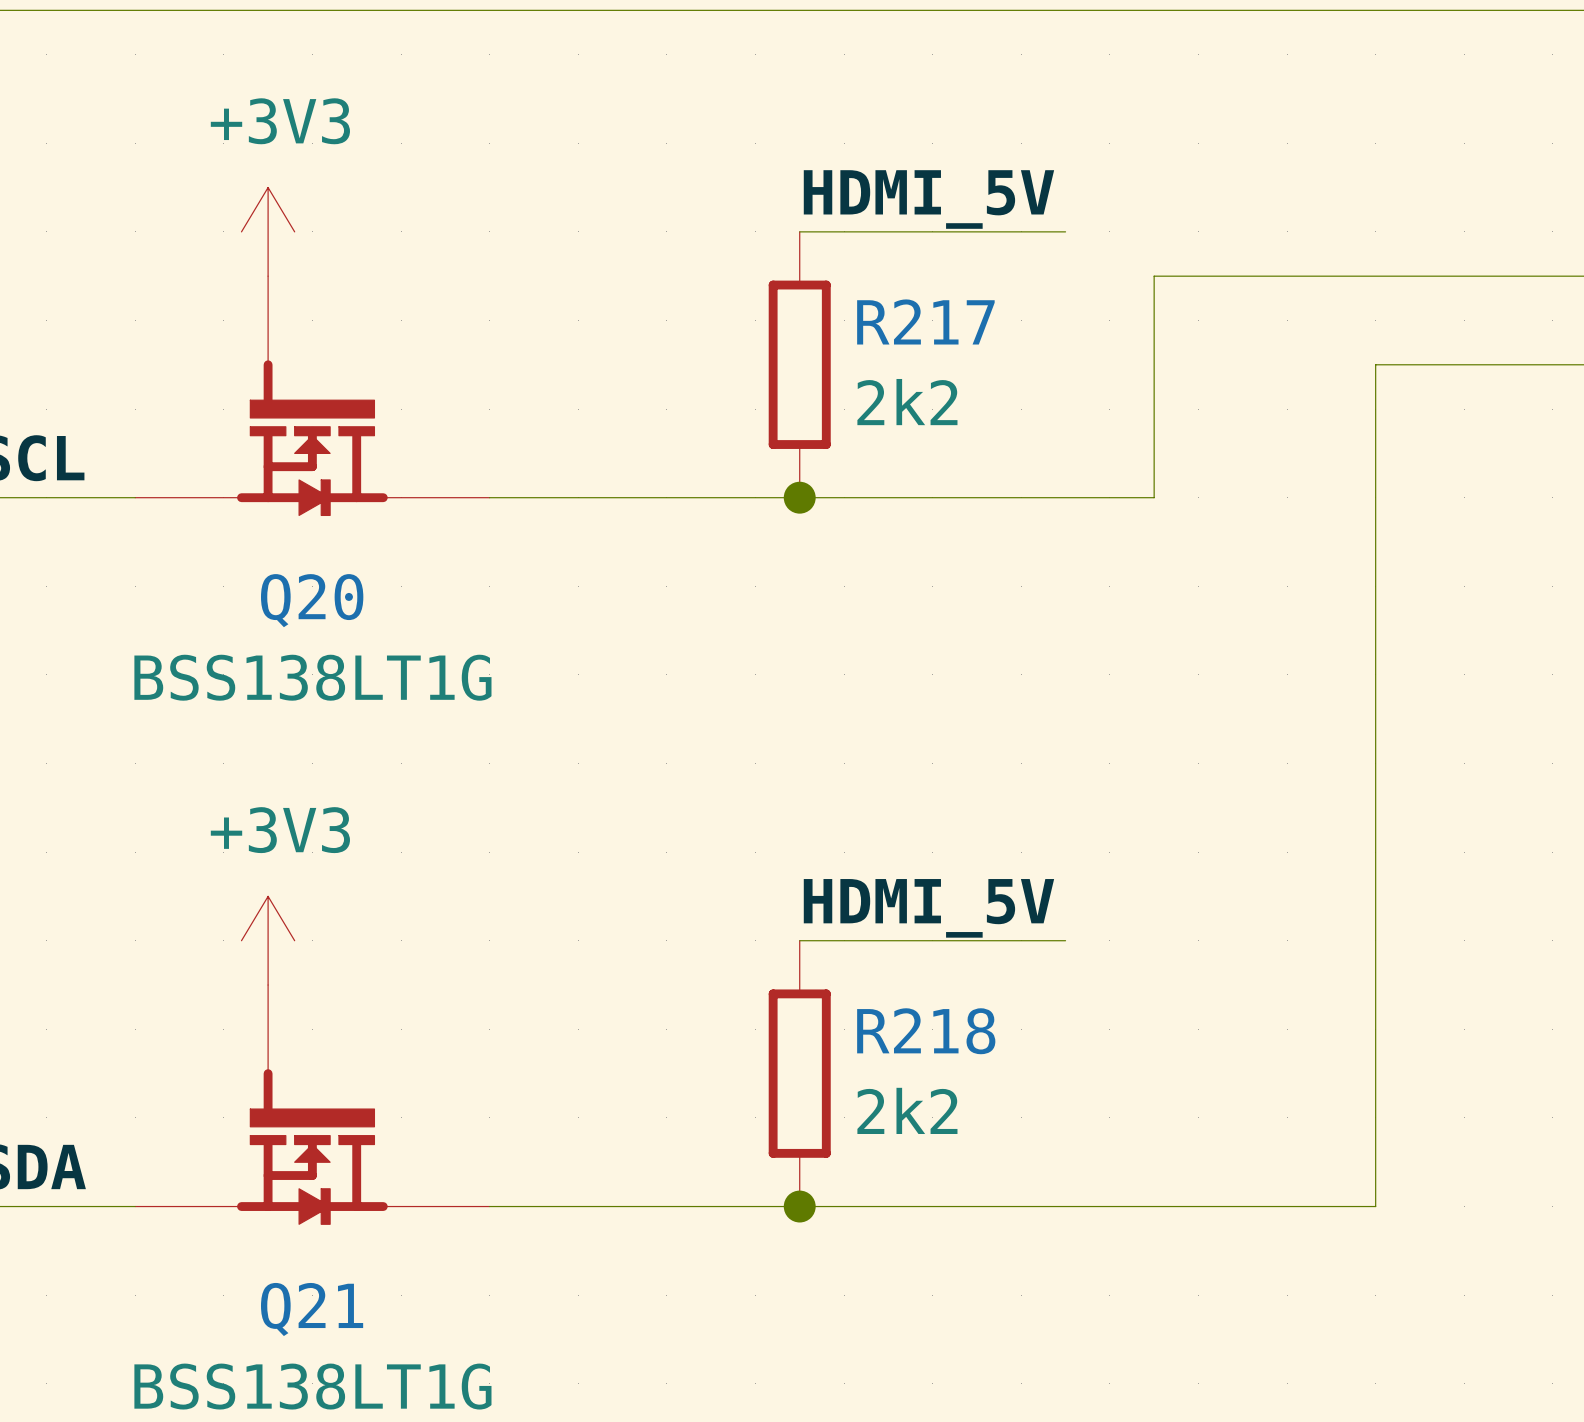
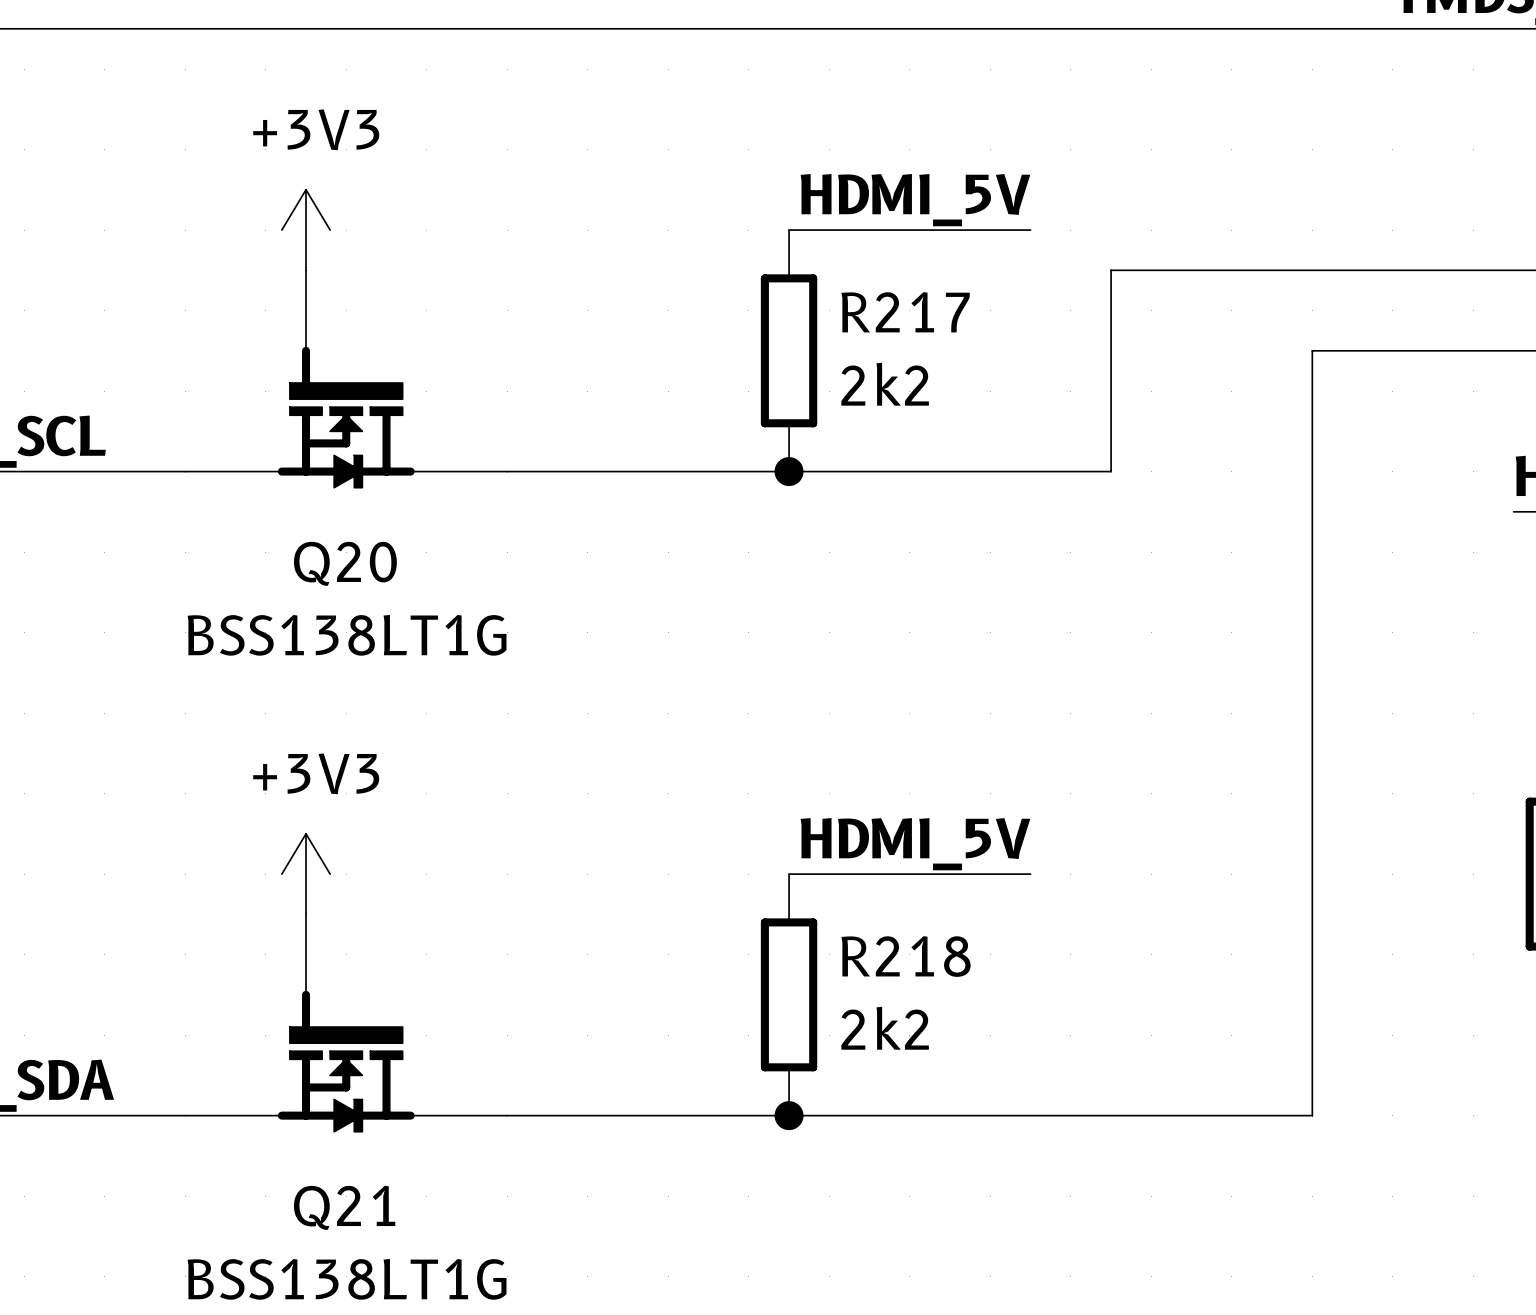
label position: HDMI_5V (928, 199) -> HDMI_5V (915, 200)
label position: HDMI_5V (928, 908) -> HDMI_5V (915, 844)

